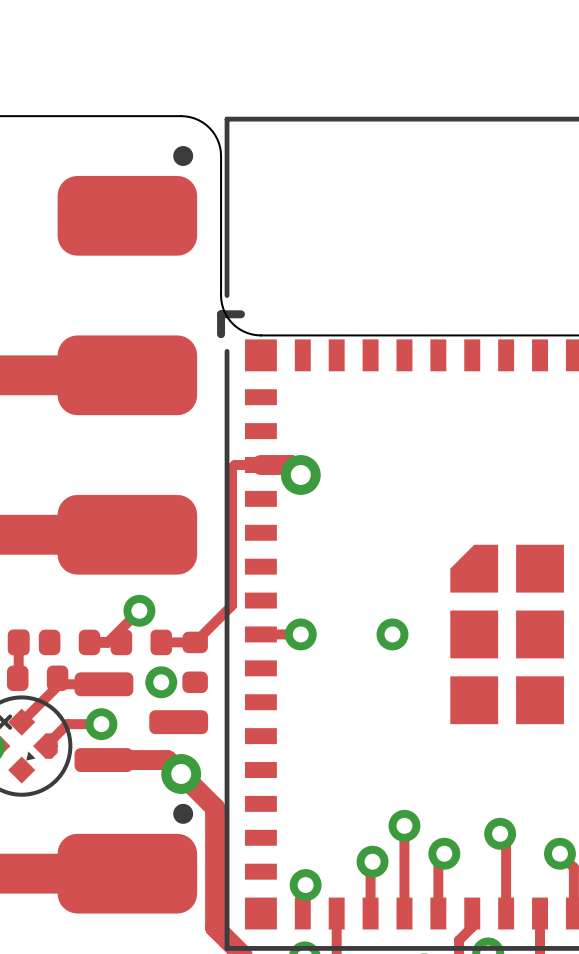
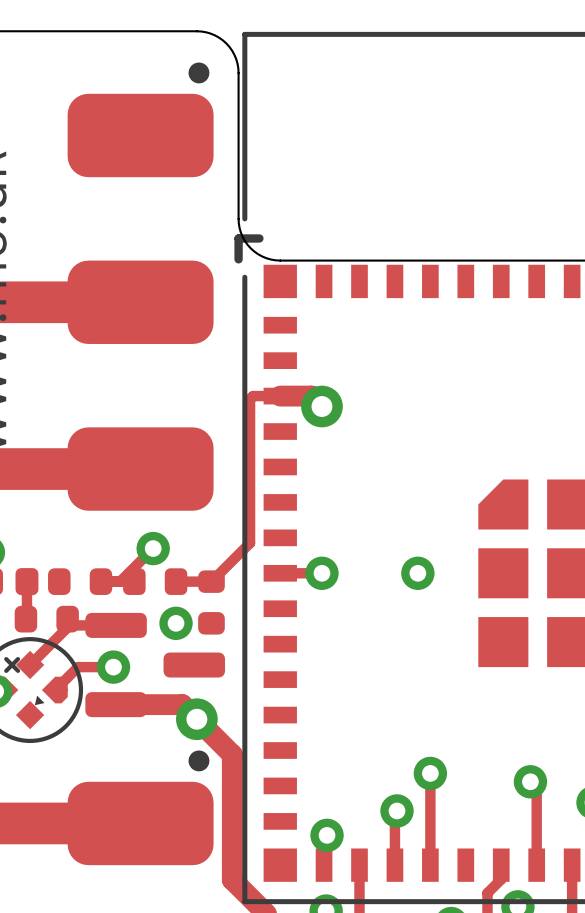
track: (444, 853) (438, 859) (438, 913) -> none
via: (444, 853) -> none

